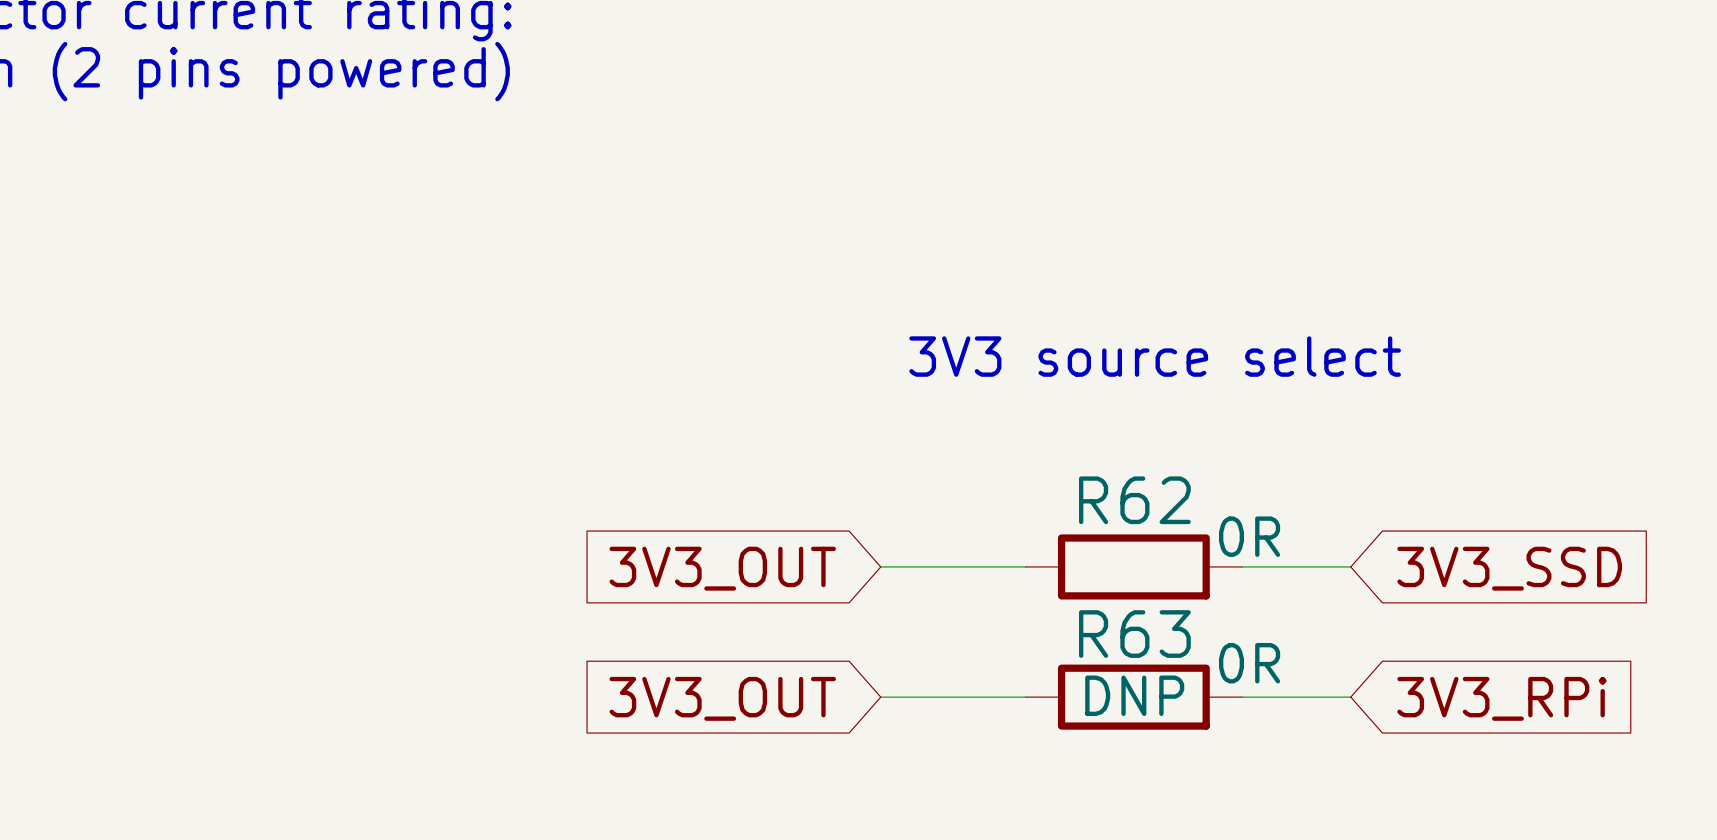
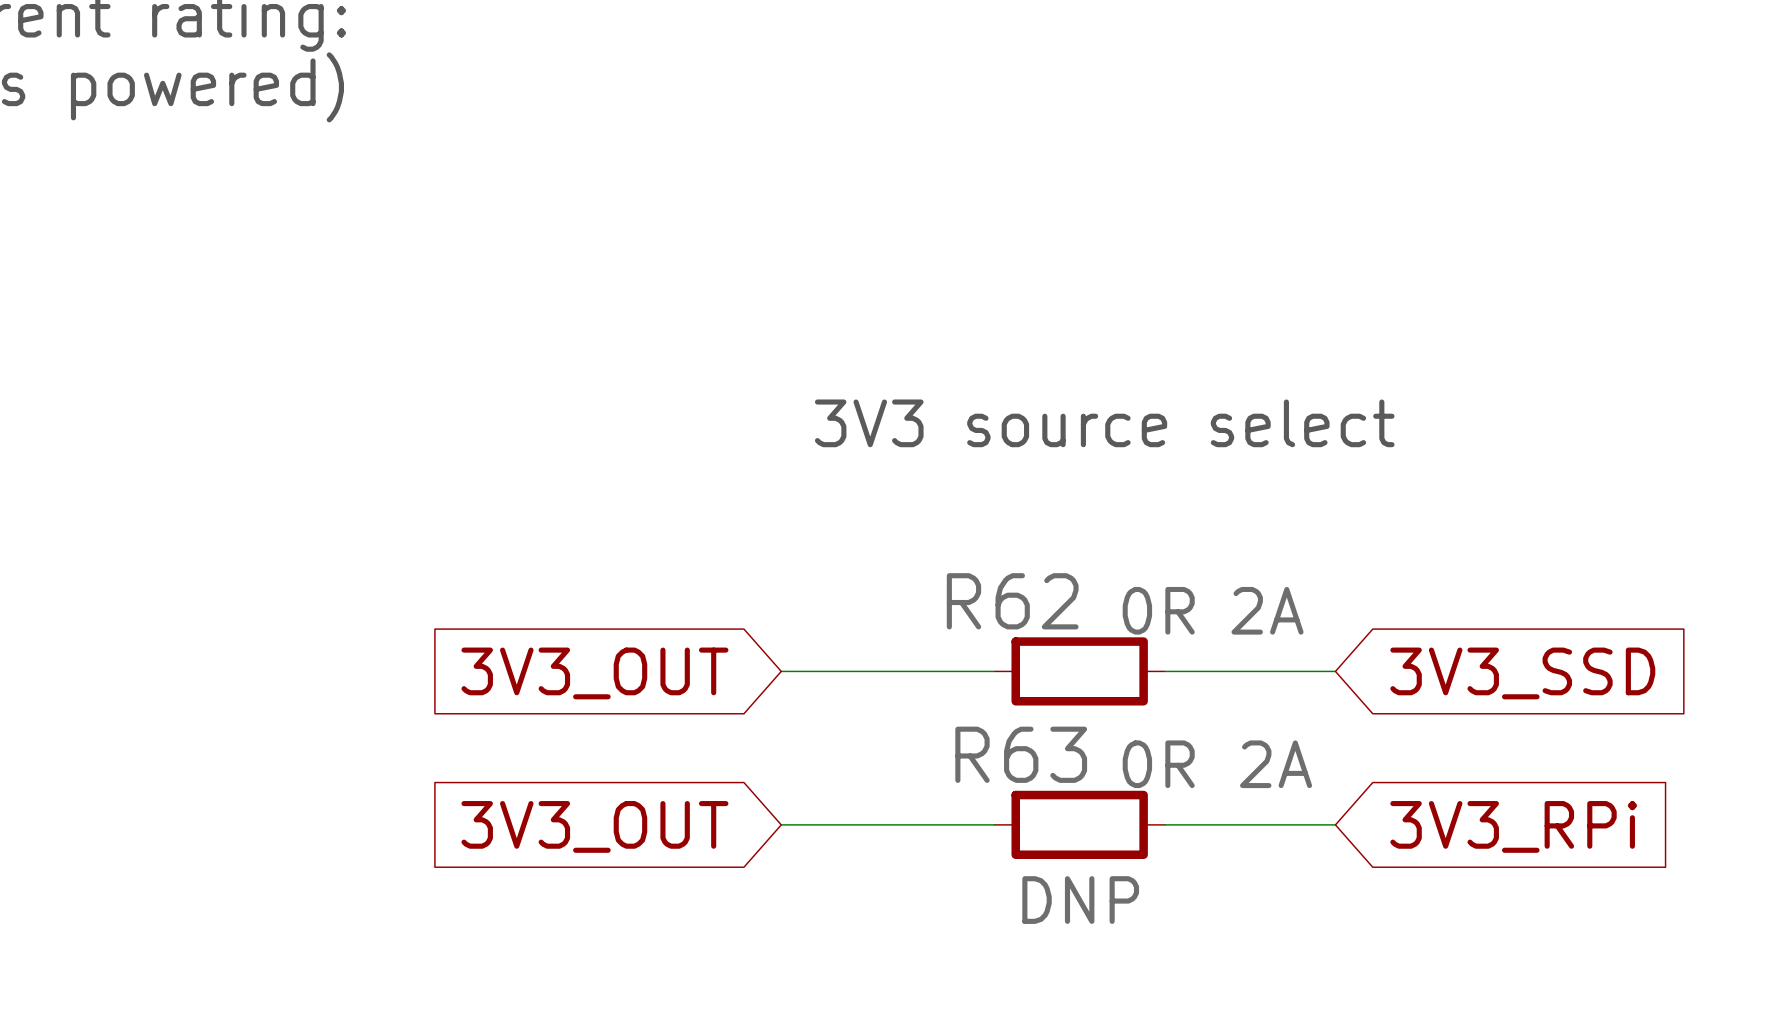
R62 name position: R62 (1134, 500) -> R62 (1012, 601)
R62 text: none -> 2A (1267, 610)
R62 symbol: [1025, 534, 1243, 600] -> [994, 637, 1165, 706]
R63 text: none -> 2A (1276, 764)
R63 symbol: [1025, 664, 1243, 730] -> [994, 790, 1165, 859]
R63 text position: DNP (1134, 695) -> DNP (1080, 900)

